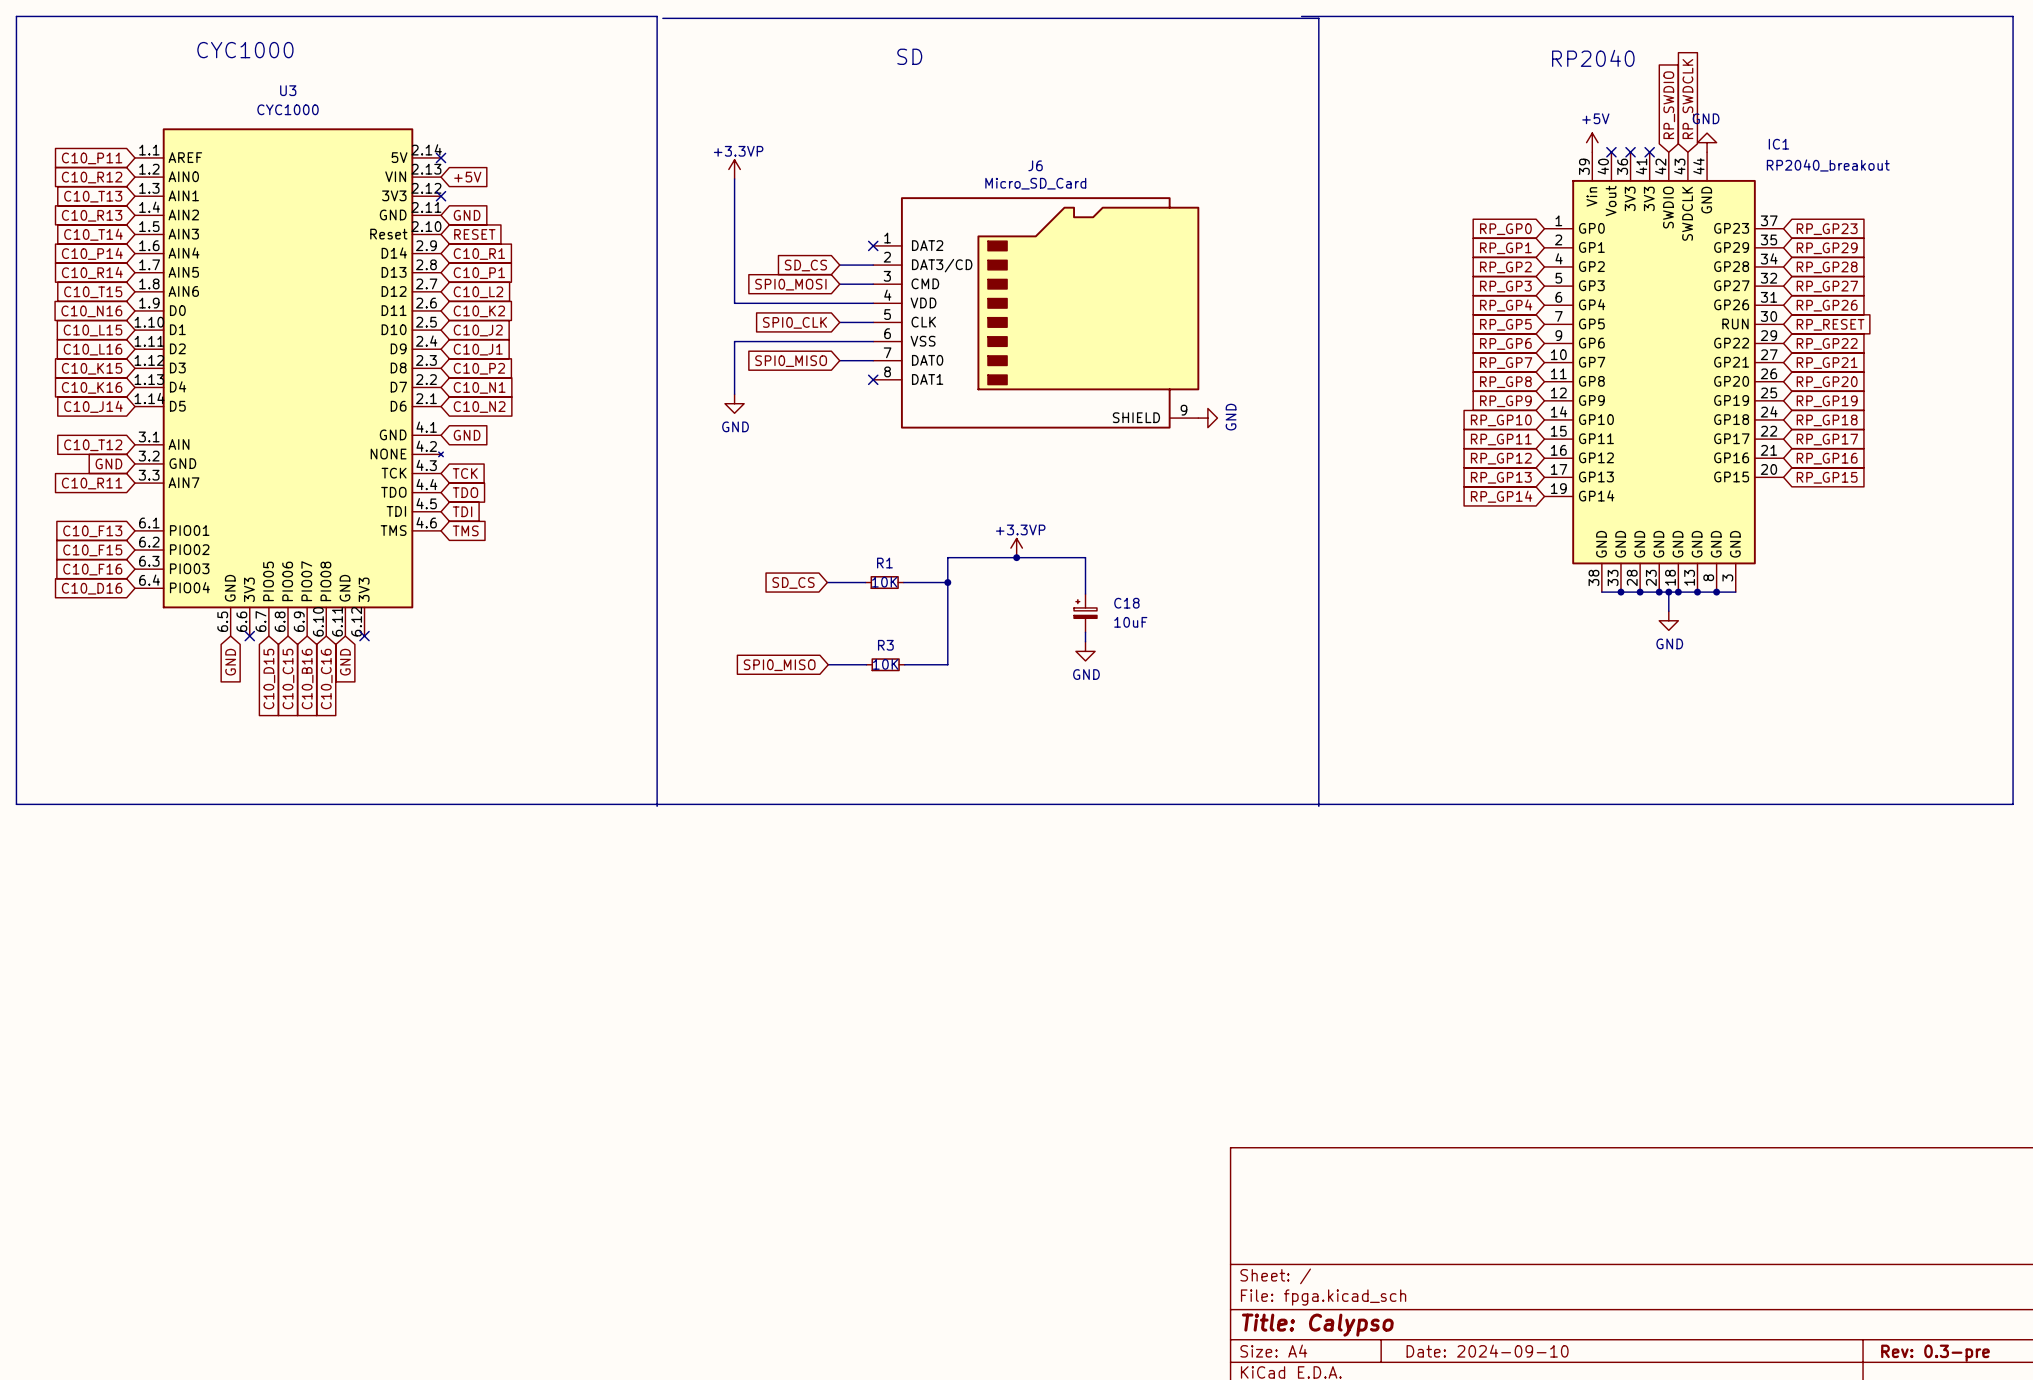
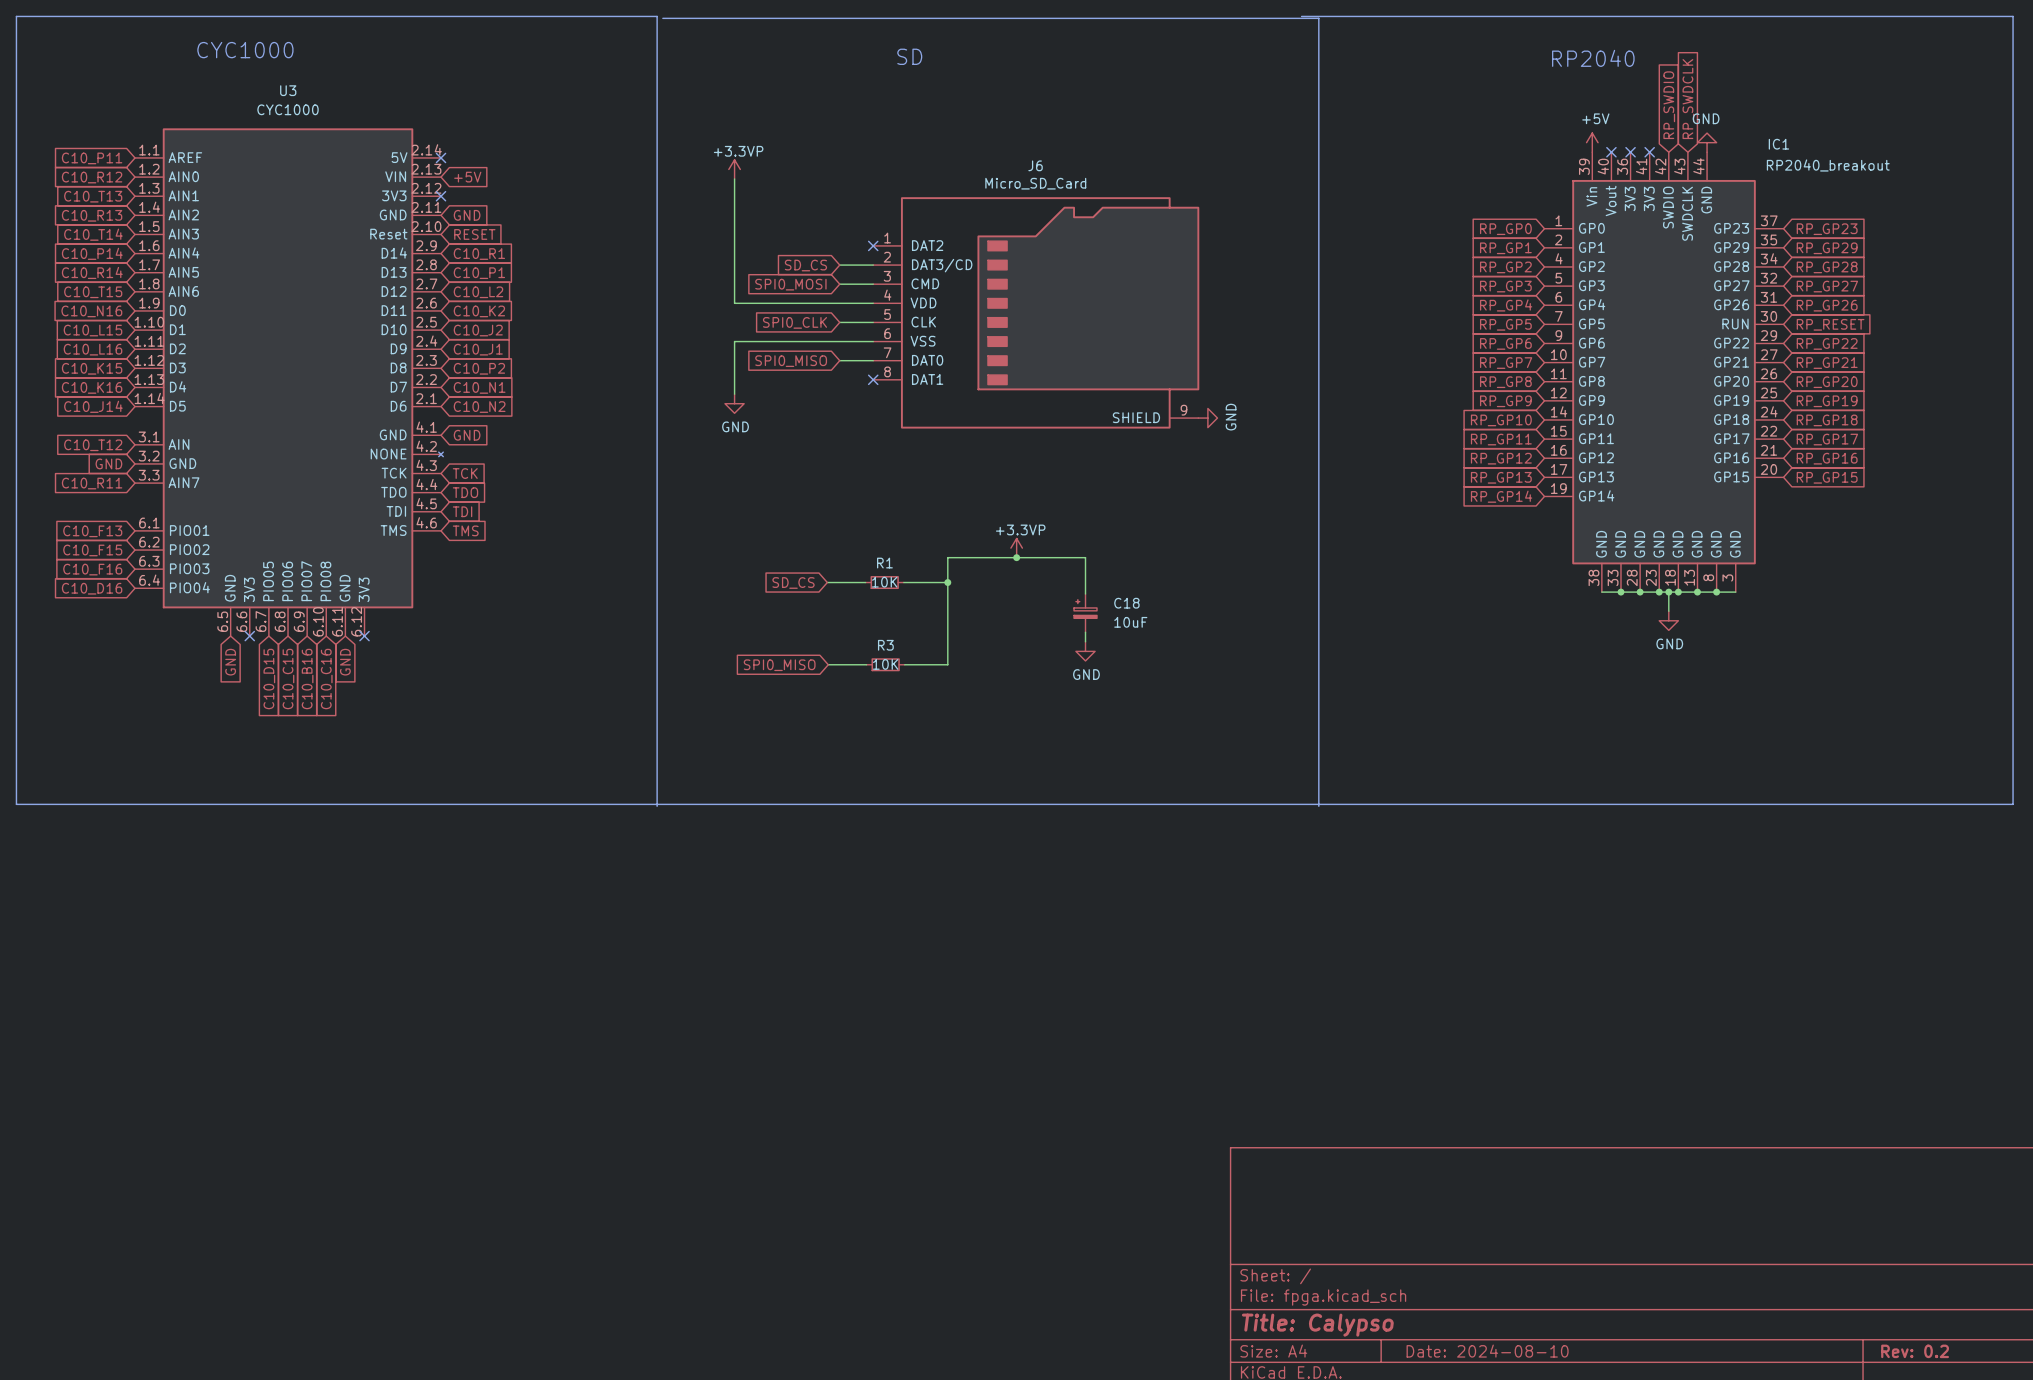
title block: Date: 2024-09-10 (1487, 1351) -> Date: 2024-08-10 (1487, 1351)
title block: Rev: 0.3-pre (1935, 1353) -> Rev: 0.2 (1915, 1351)

